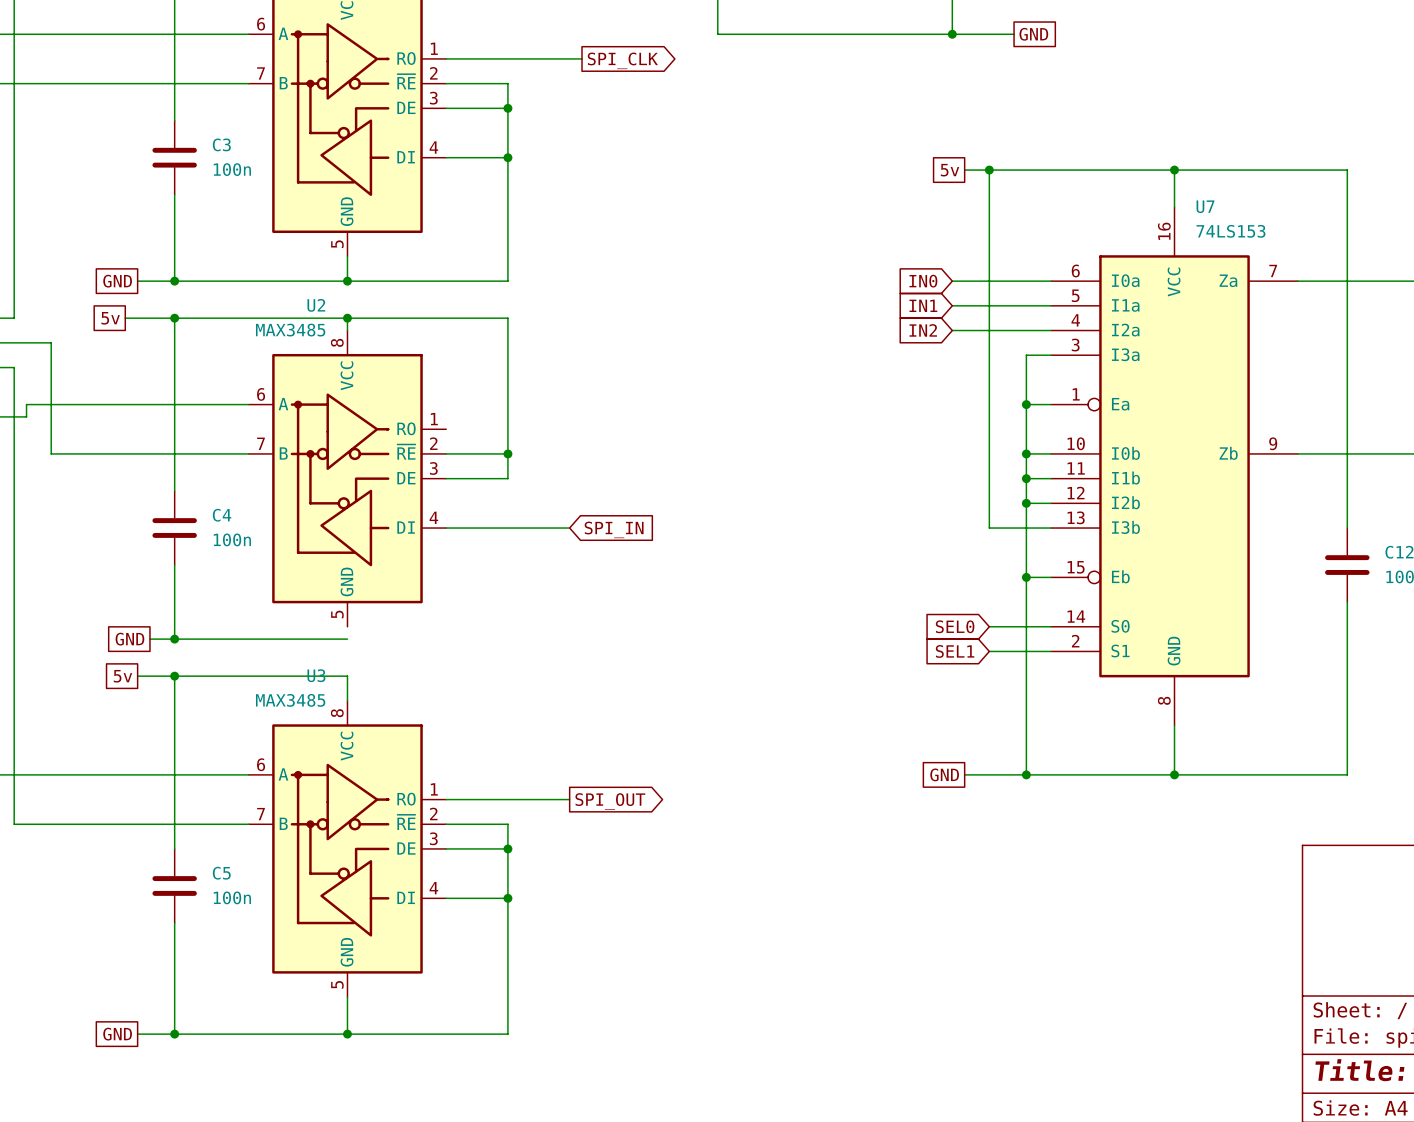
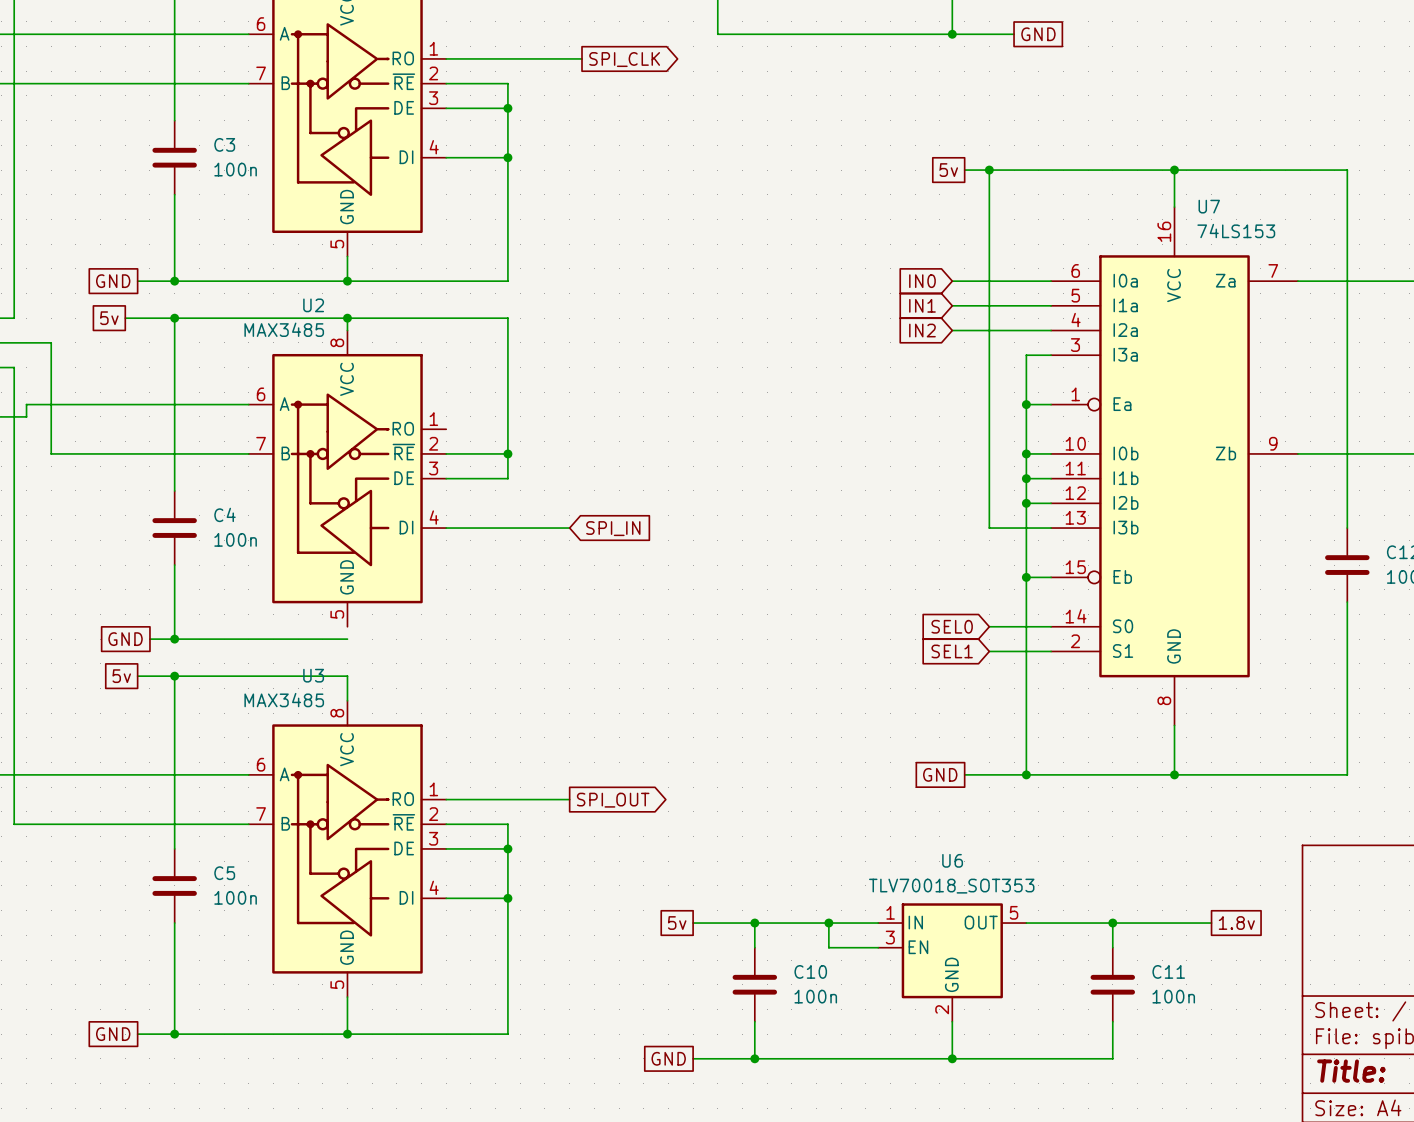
global label: none -> 5v (677, 923)
wire: none -> (693, 923) (878, 923)
wire: none -> (754, 923) (754, 947)
junction: none -> (754, 923)
wire: none -> (828, 923) (828, 947) (878, 947)
junction: none -> (828, 923)
wire: none -> (1026, 923) (1211, 923)
wire: none -> (1112, 923) (1112, 947)
junction: none -> (1112, 923)
global label: none -> 1.8v (1236, 923)
U6: none -> TLV70018_SOT353 (952, 962)
C10: none -> 100n (754, 984)
C11: none -> 100n (1112, 984)
wire: none -> (754, 1021) (754, 1058)
wire: none -> (952, 1021) (952, 1058)
wire: none -> (1112, 1021) (1112, 1058) (693, 1058)
global label: none -> GND (668, 1058)
junction: none -> (754, 1058)
junction: none -> (952, 1058)

